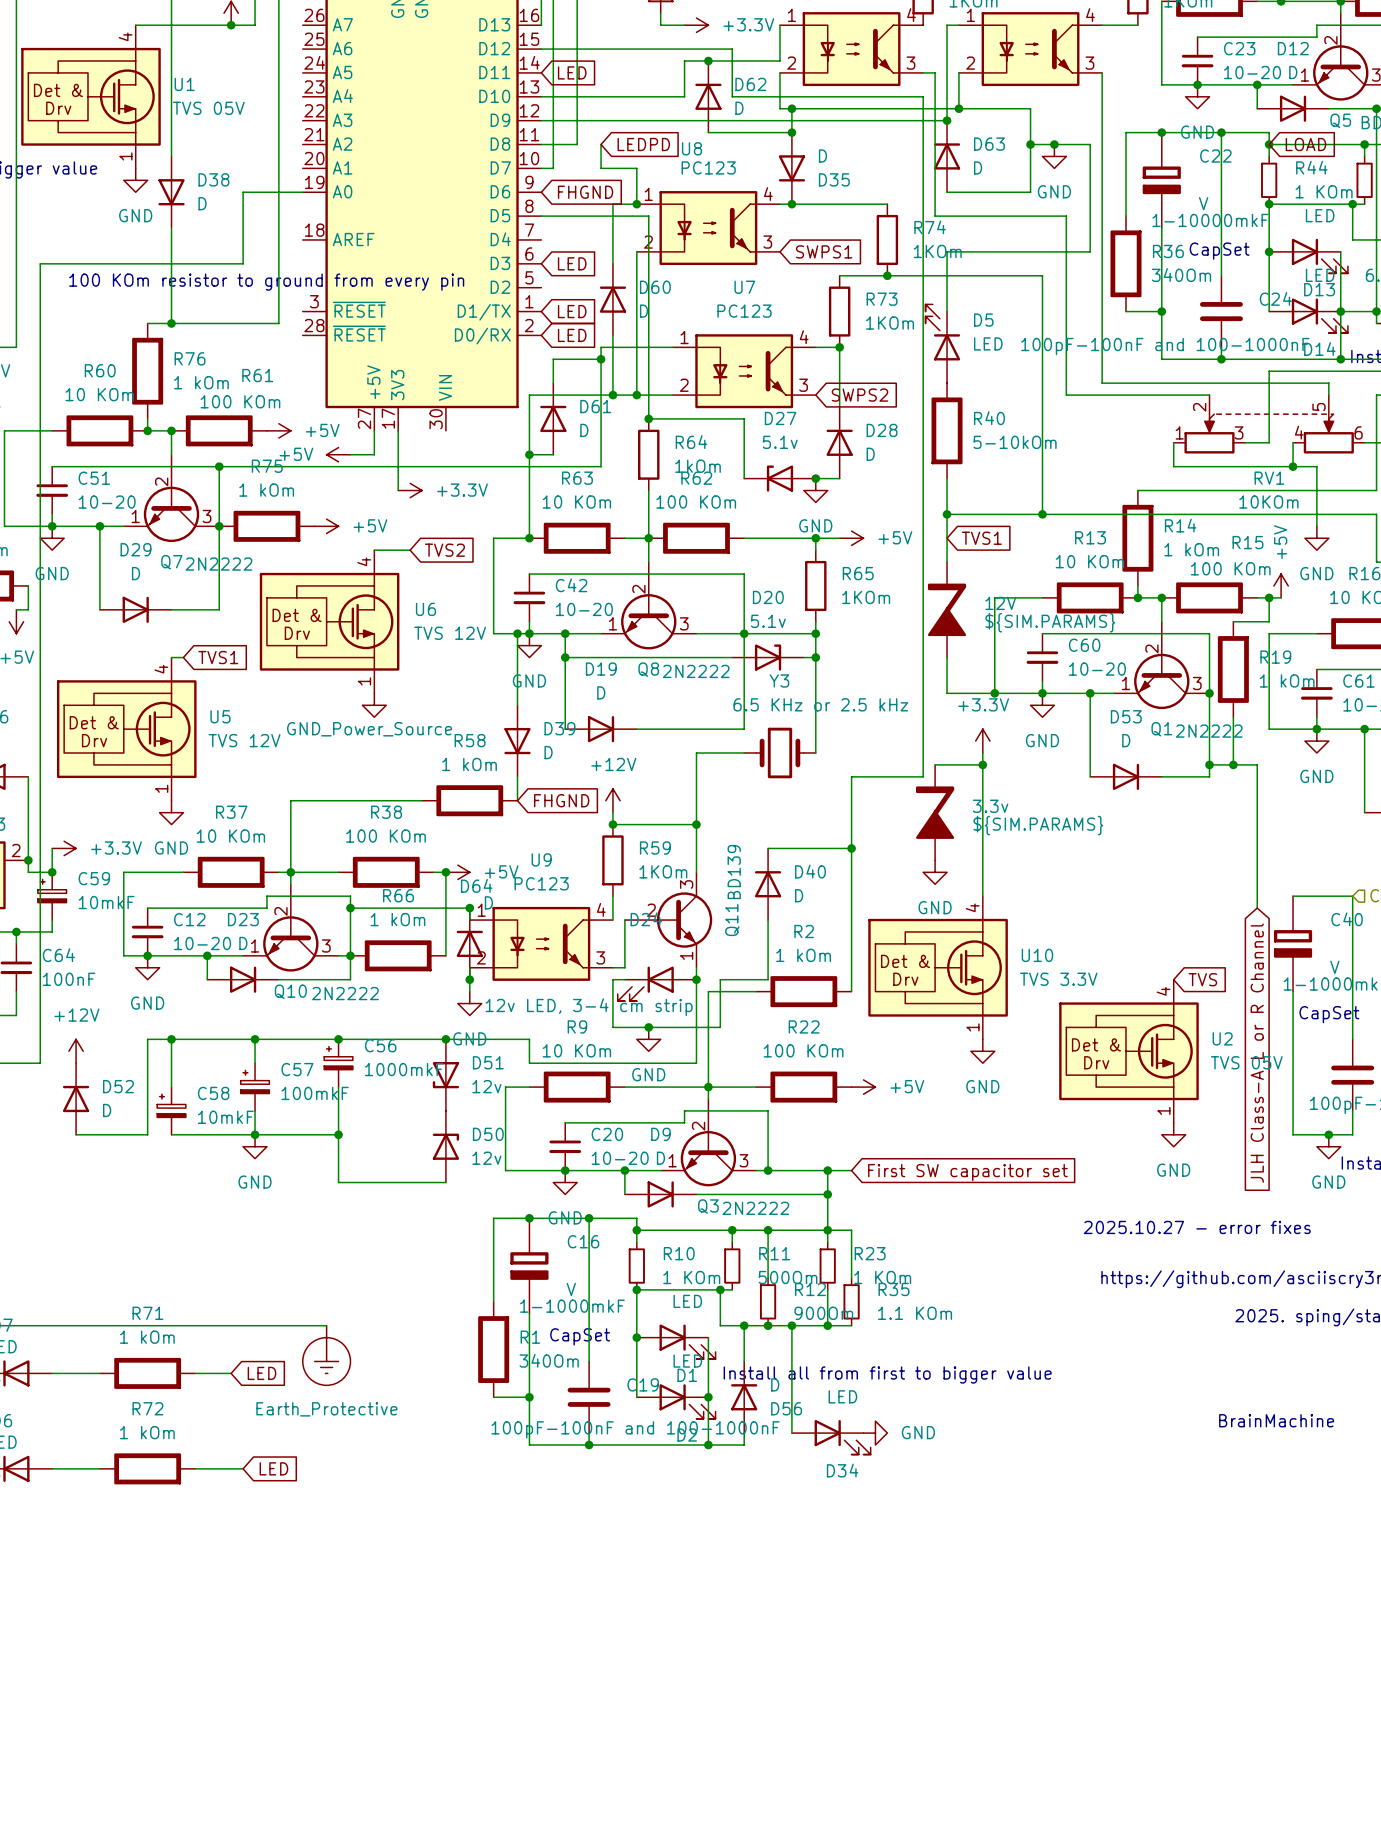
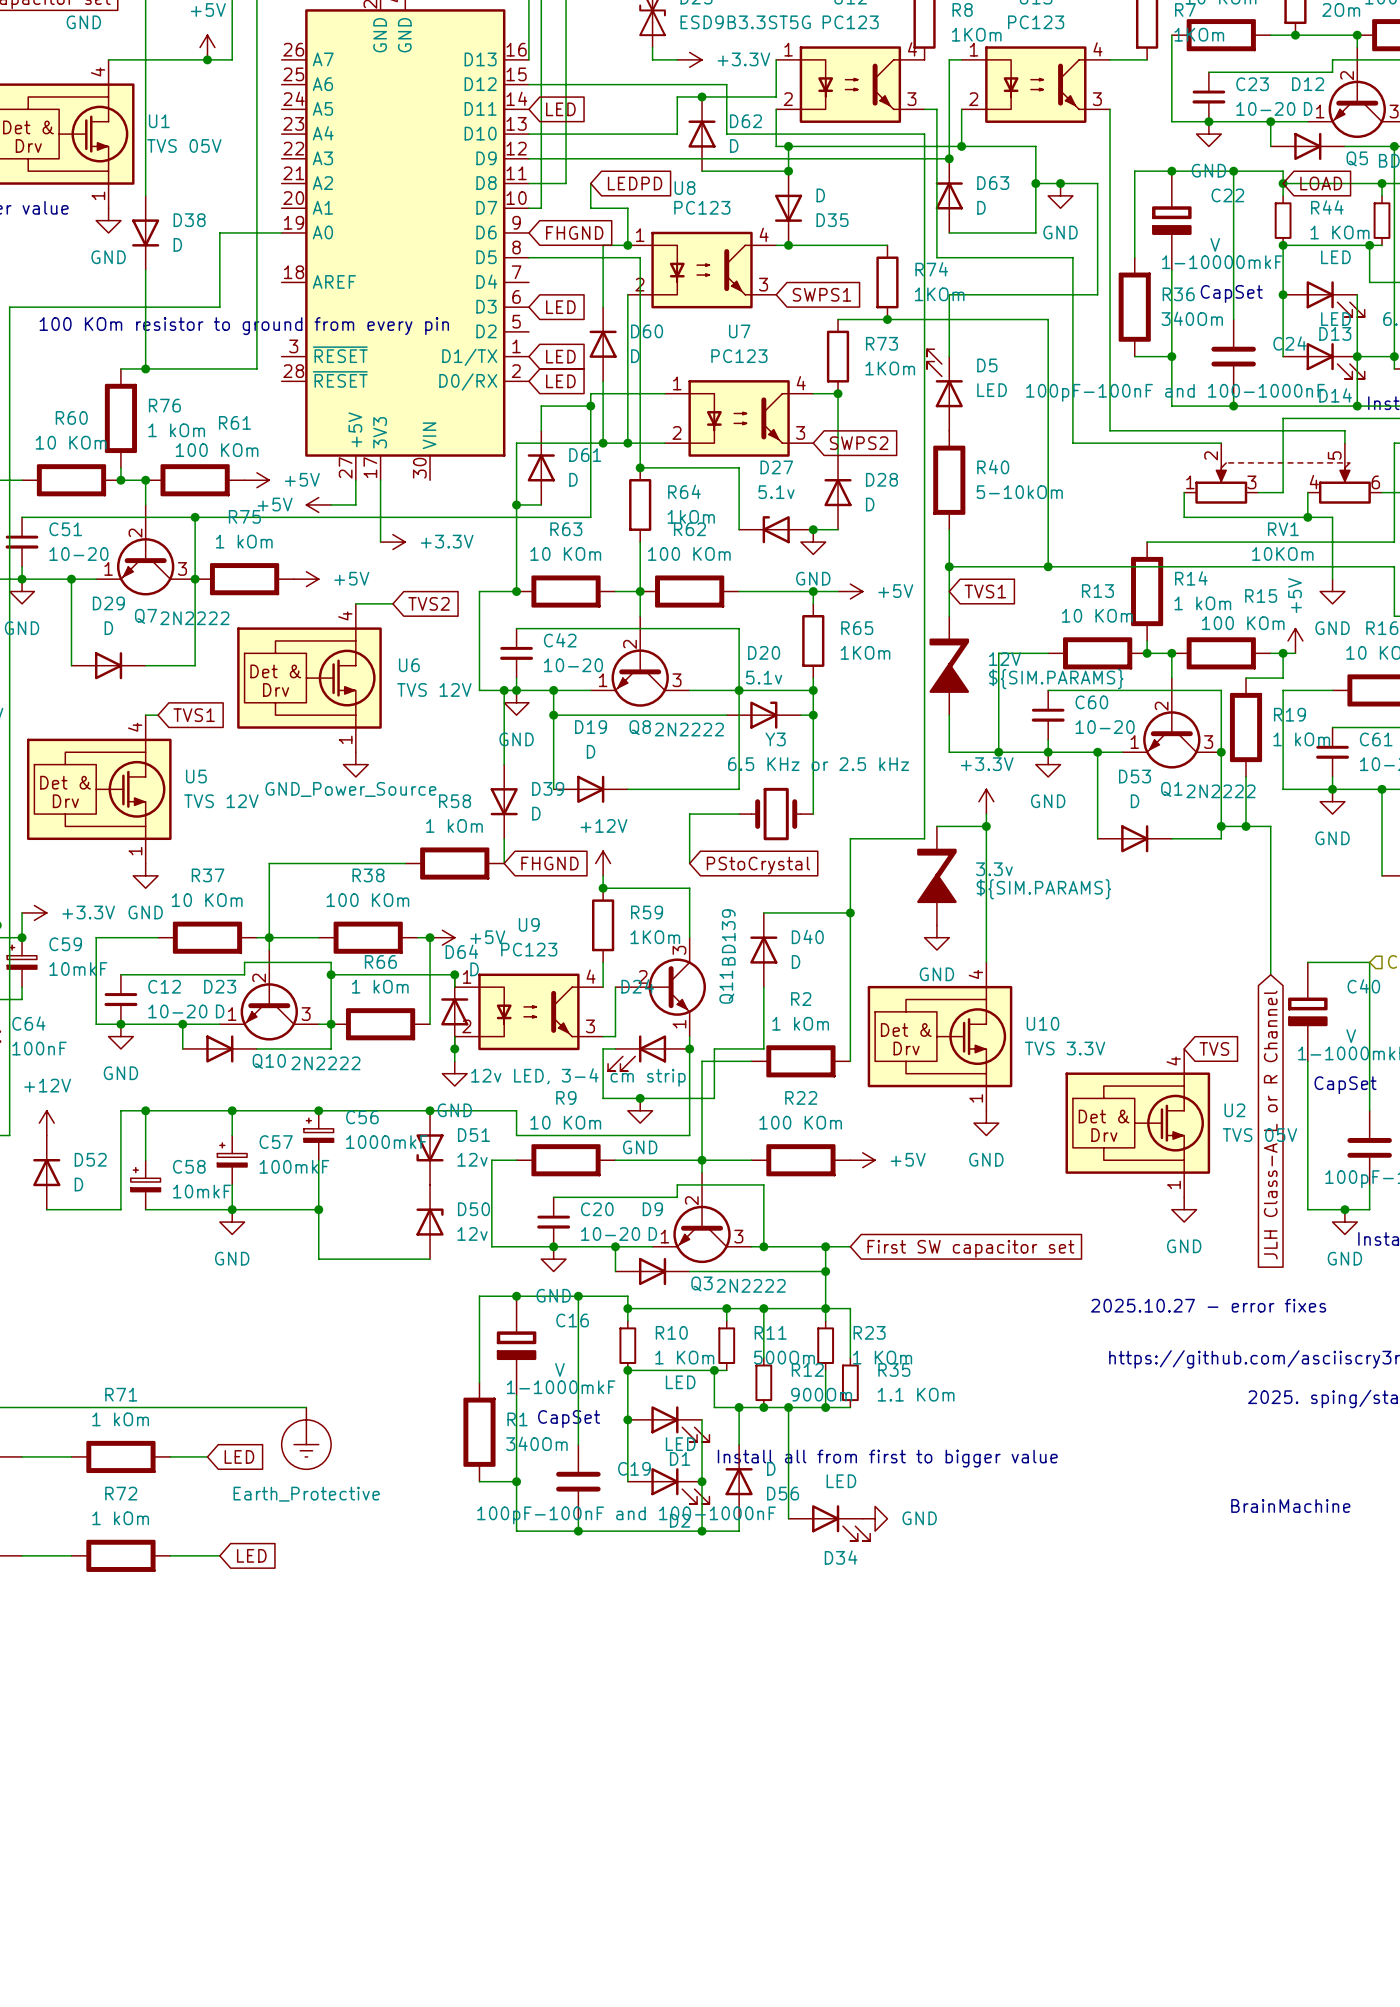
wire: (696, 800) (696, 824) -> none
global label: none -> PStoCrystal (758, 865)
junction: (696, 824) -> none

